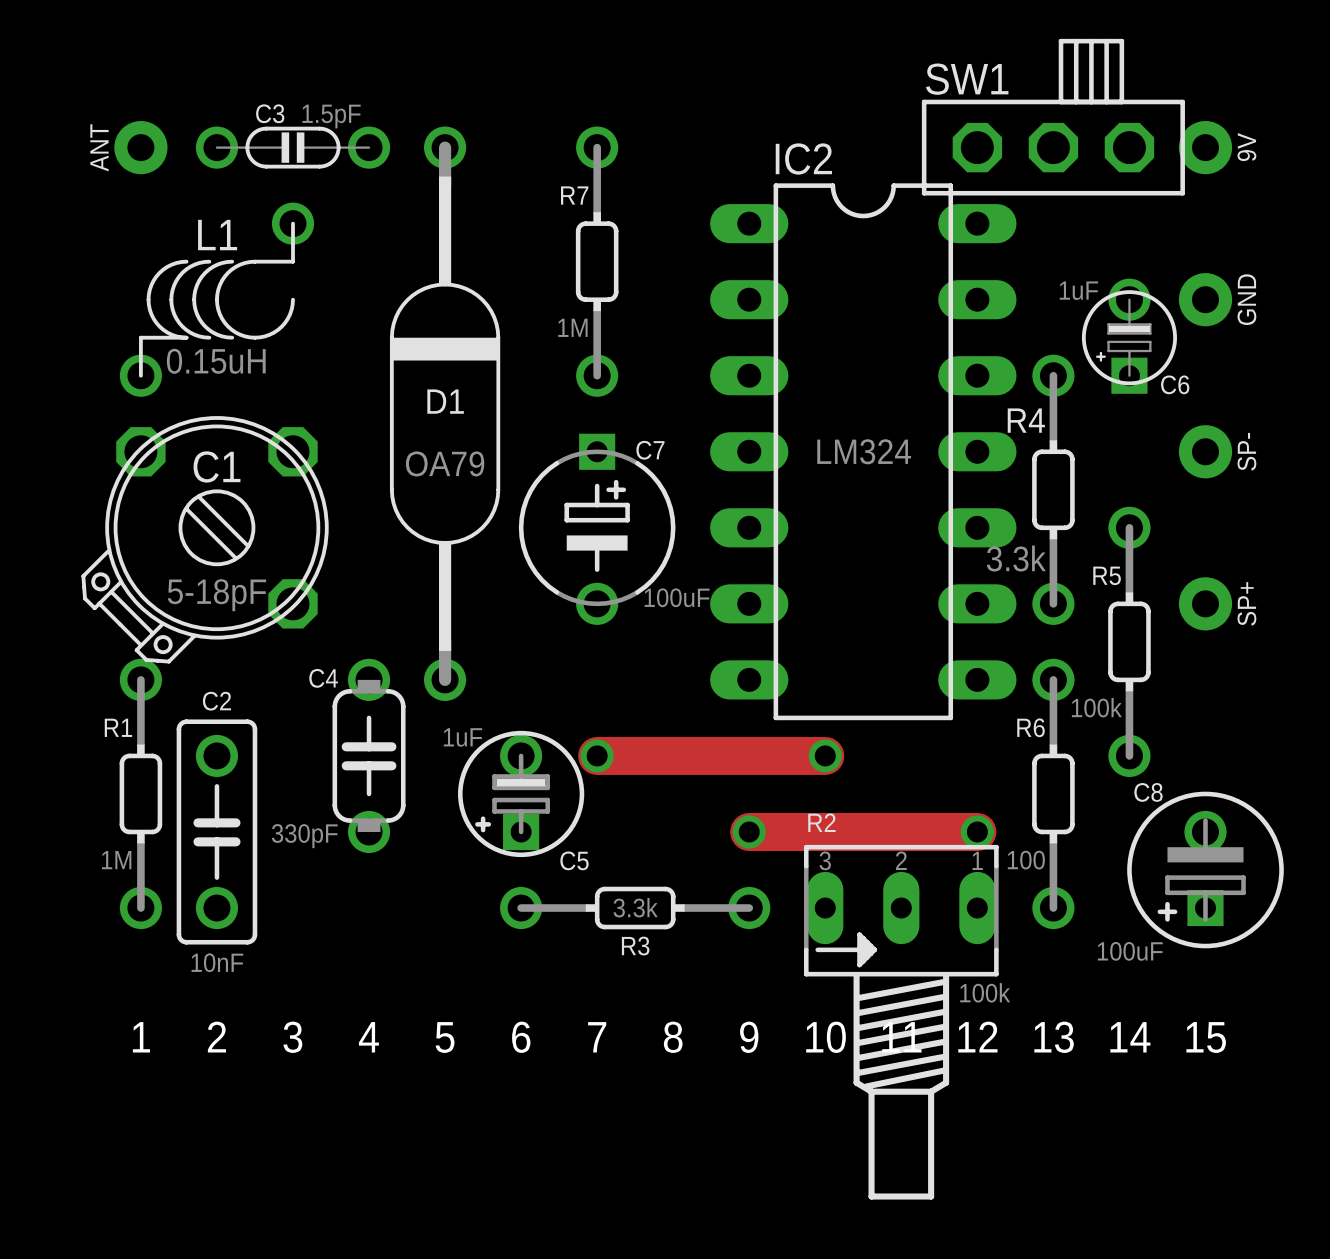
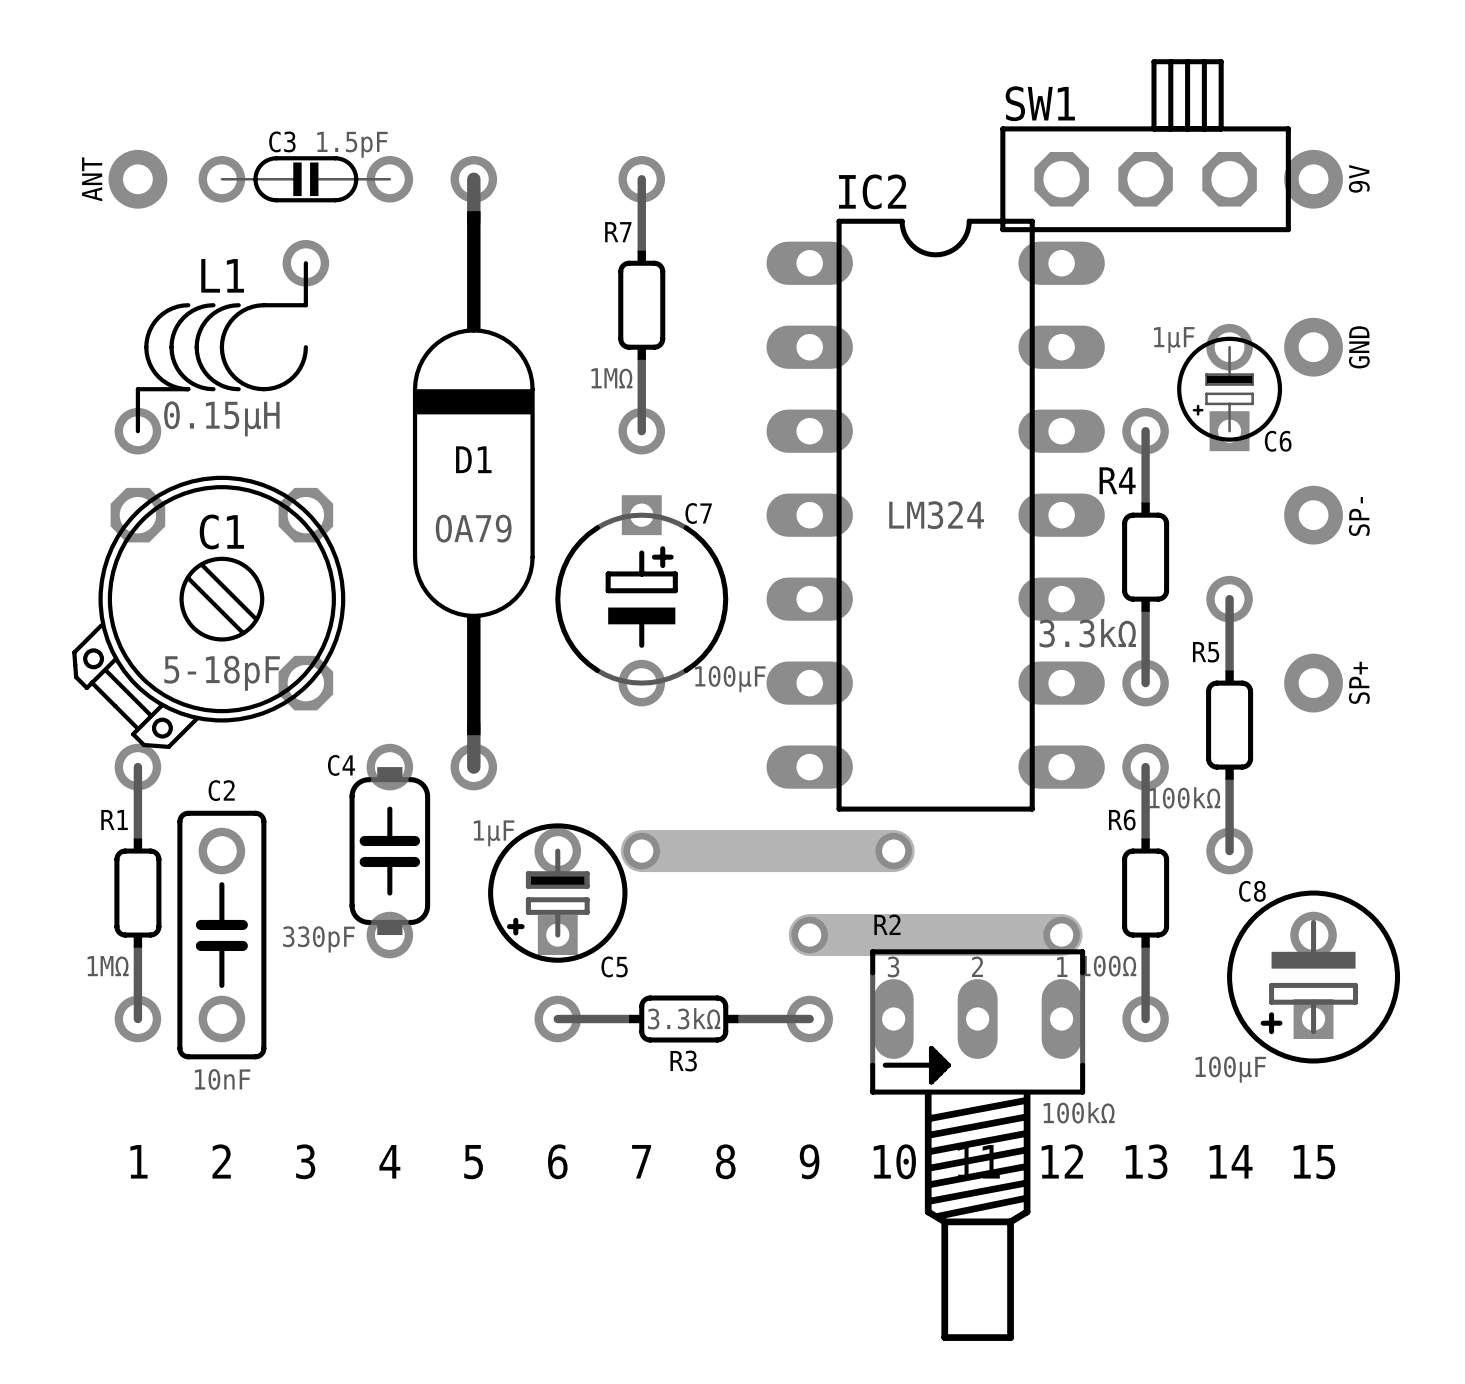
C6 value: 1uF (1078, 290) -> 1μF (1174, 340)
R7 value: 1M (572, 327) -> 1MΩ (611, 378)
L1 value: 0.15uH (216, 361) -> 0.15μH (221, 418)
R4 value: 3.3k (1016, 558) -> 3.3kΩ (1087, 633)
C7 value: 100uF (677, 597) -> 100μF (730, 679)
R5 value: 100k (1096, 707) -> 100kΩ (1184, 797)
C5 value: 1uF (462, 737) -> 1μF (494, 833)
R1 value: 1M (116, 860) -> 1MΩ (108, 966)
R6 value: 100 (1026, 860) -> 100Ω (1108, 966)
R3 value: 3.3k (635, 907) -> 3.3kΩ (684, 1018)
C8 value: 100uF (1130, 951) -> 100μF (1230, 1069)
R2 value: 100k (985, 992) -> 100kΩ (1079, 1112)

